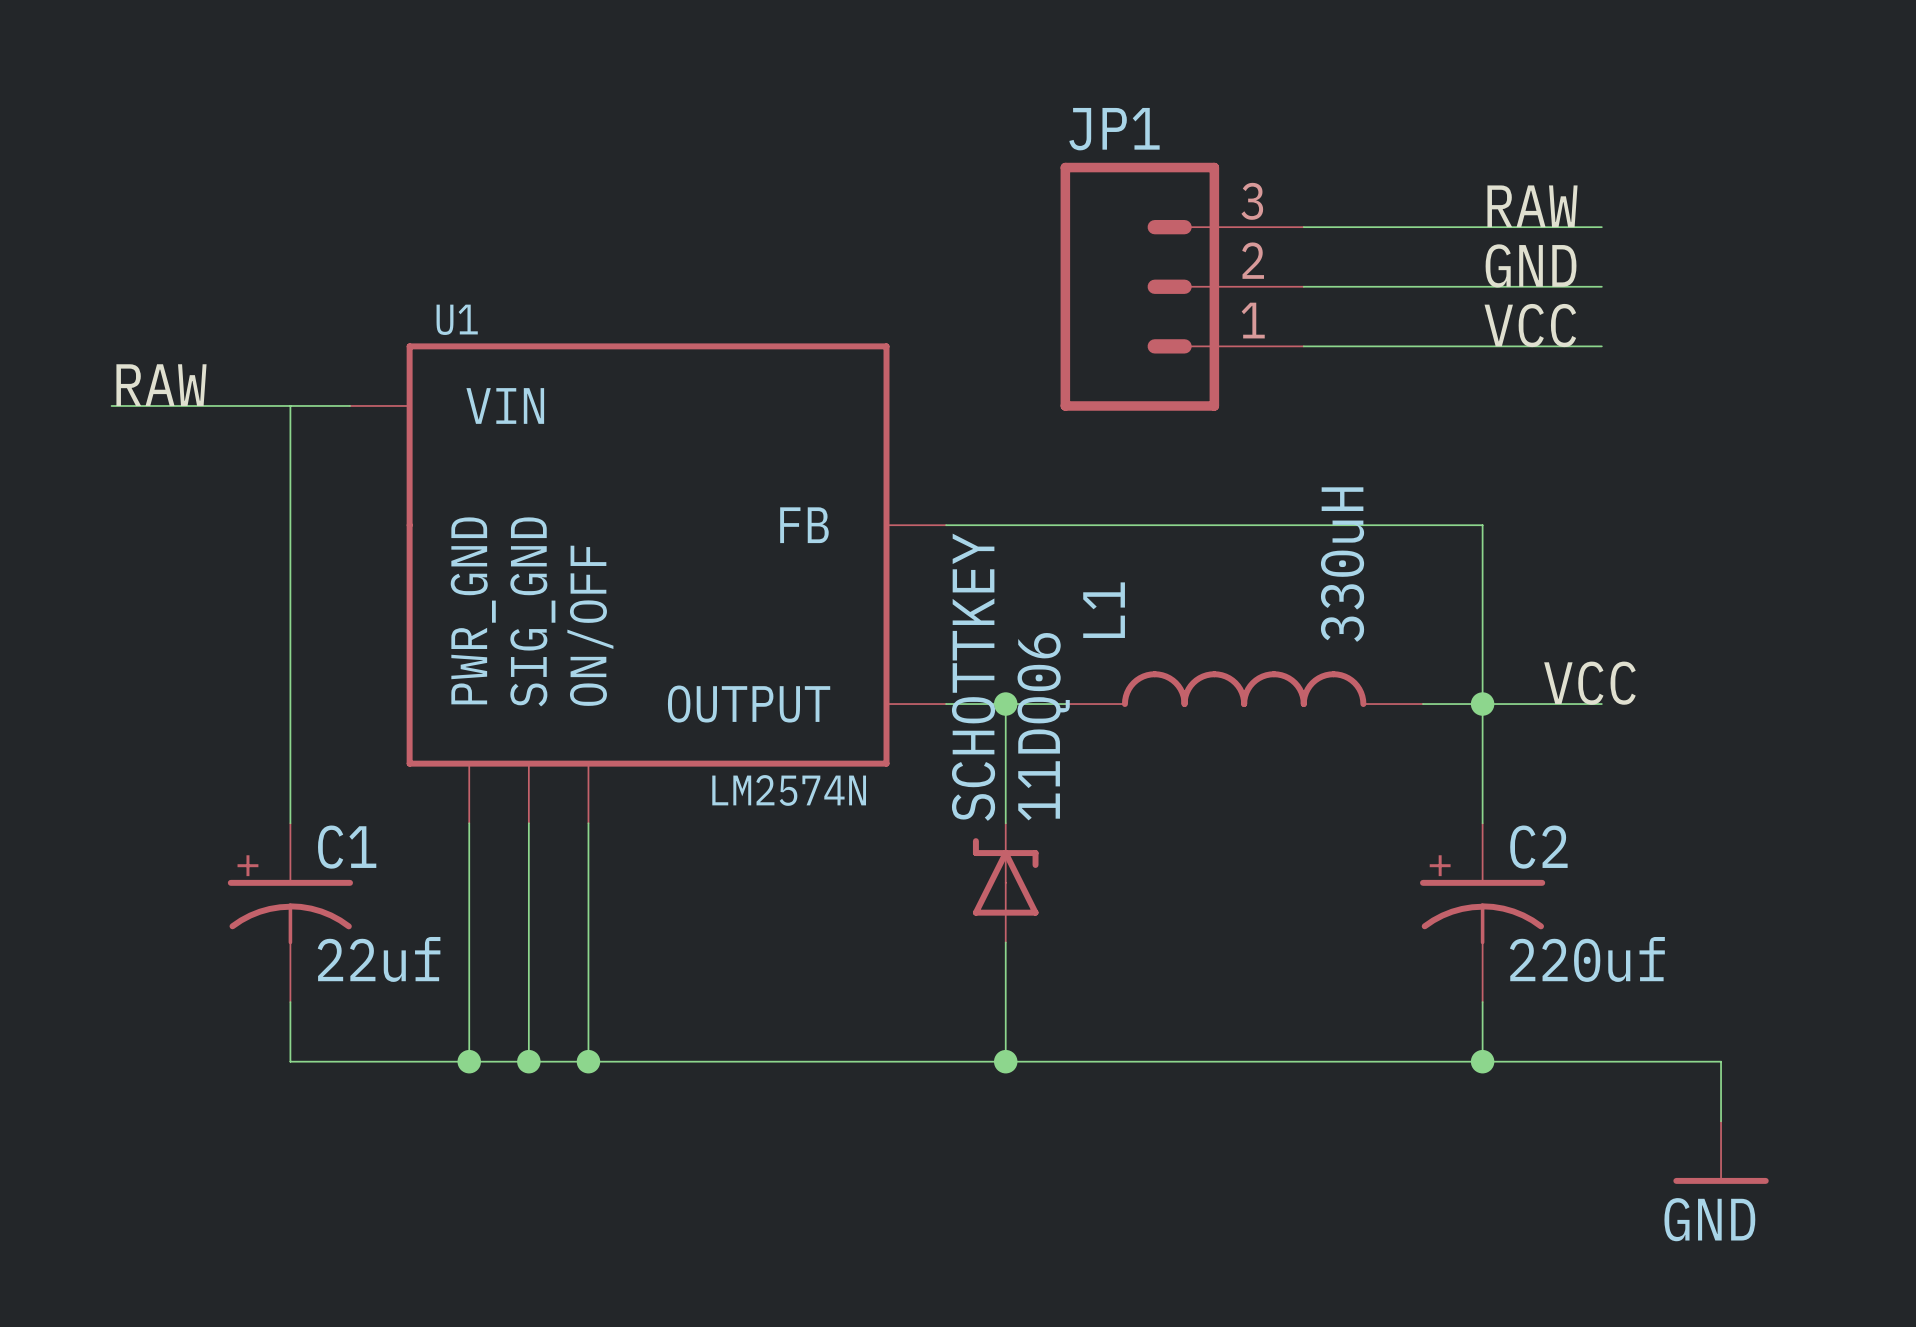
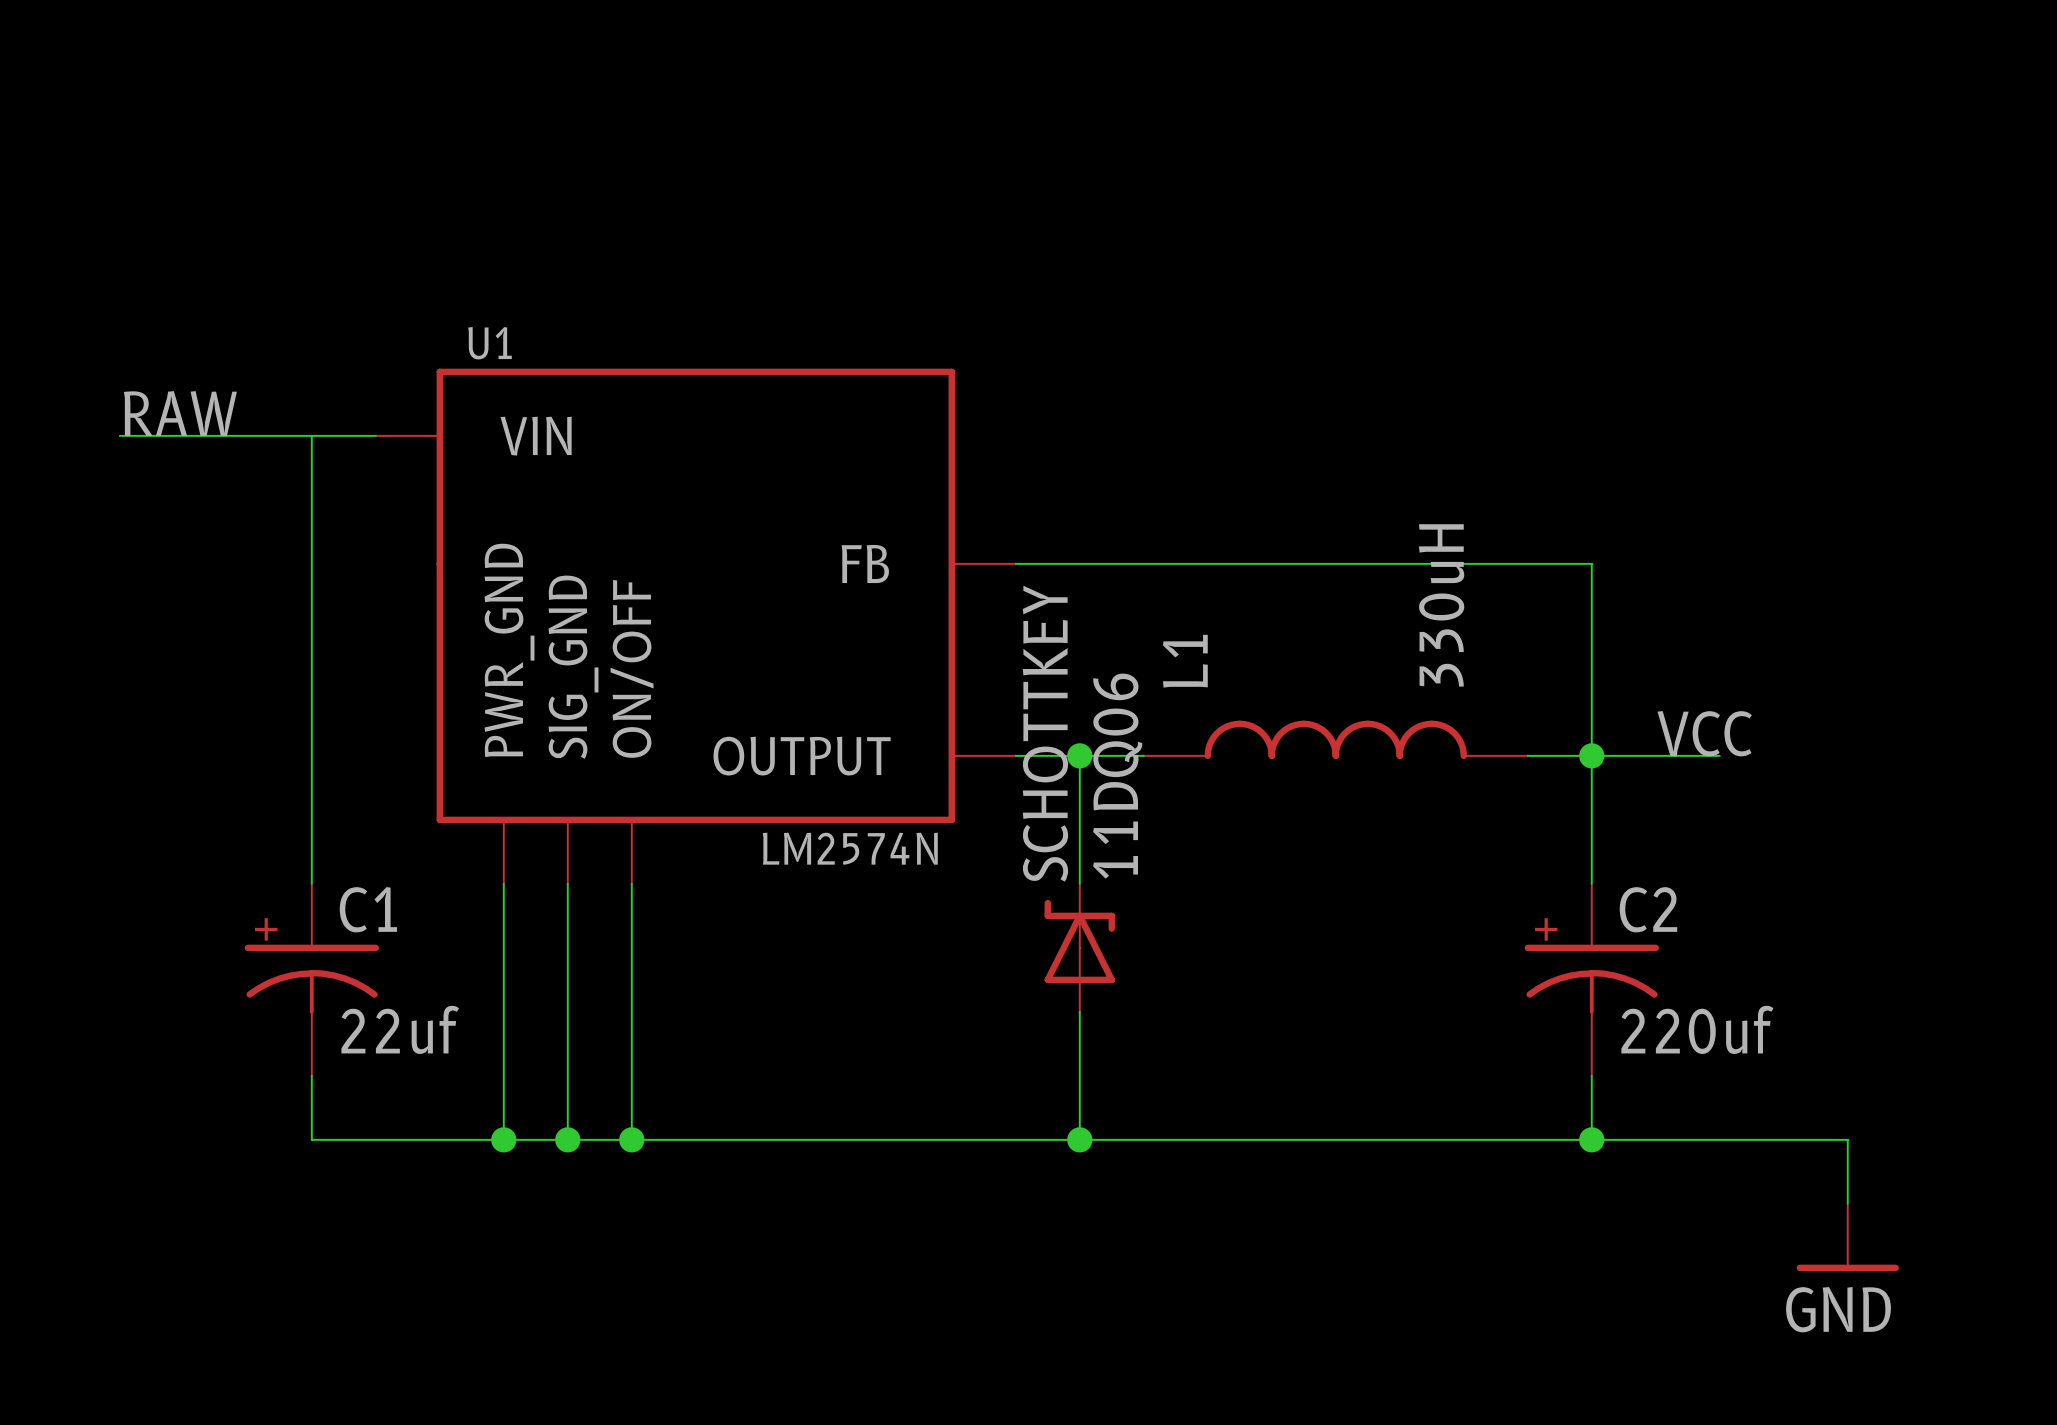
label: RAW (1532, 206) -> none
wire: (1303, 227) (1601, 227) -> none
label: GND (1531, 265) -> none
JP1: (1182, 286) -> none
wire: (1303, 286) (1601, 286) -> none
label: VCC (1530, 325) -> none
wire: (1303, 346) (1601, 346) -> none

